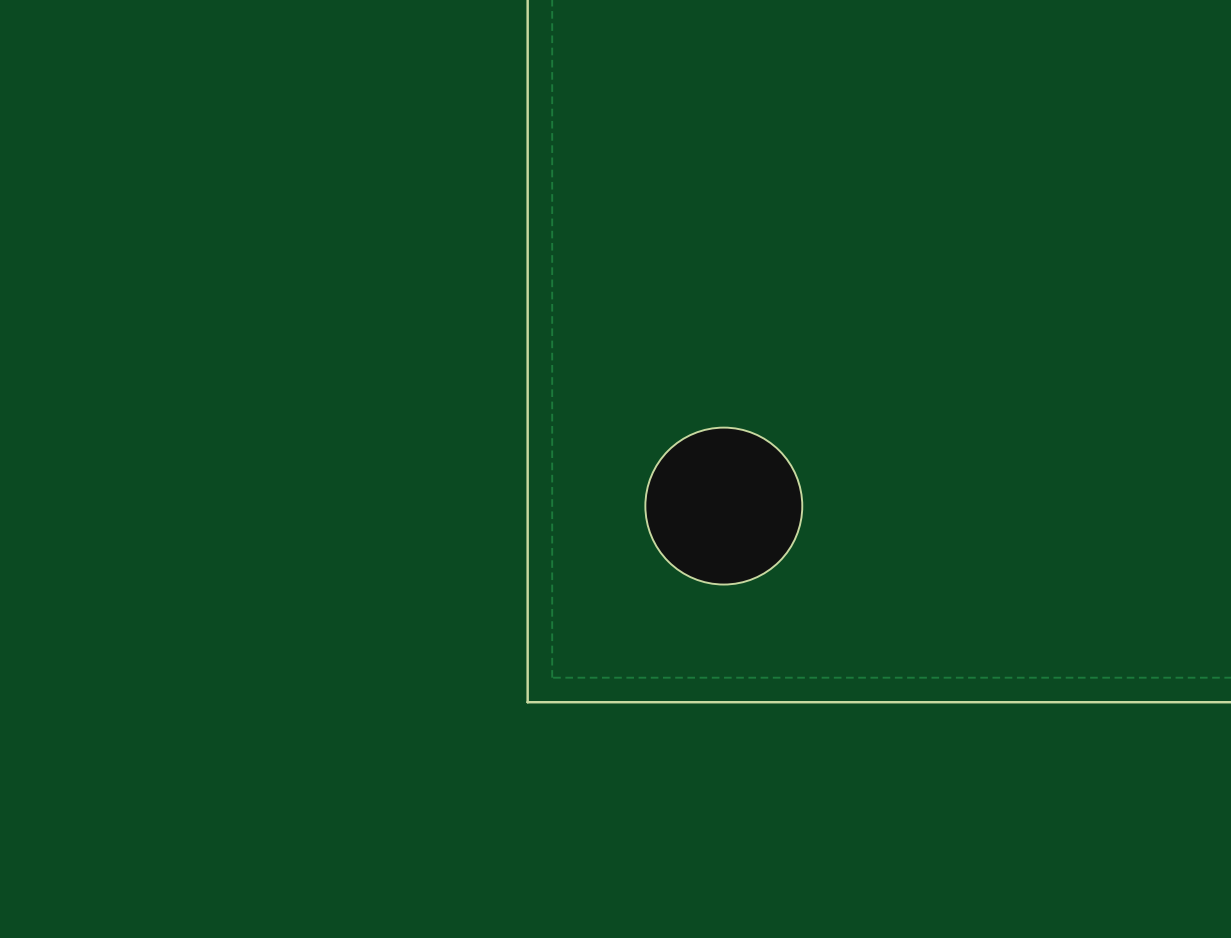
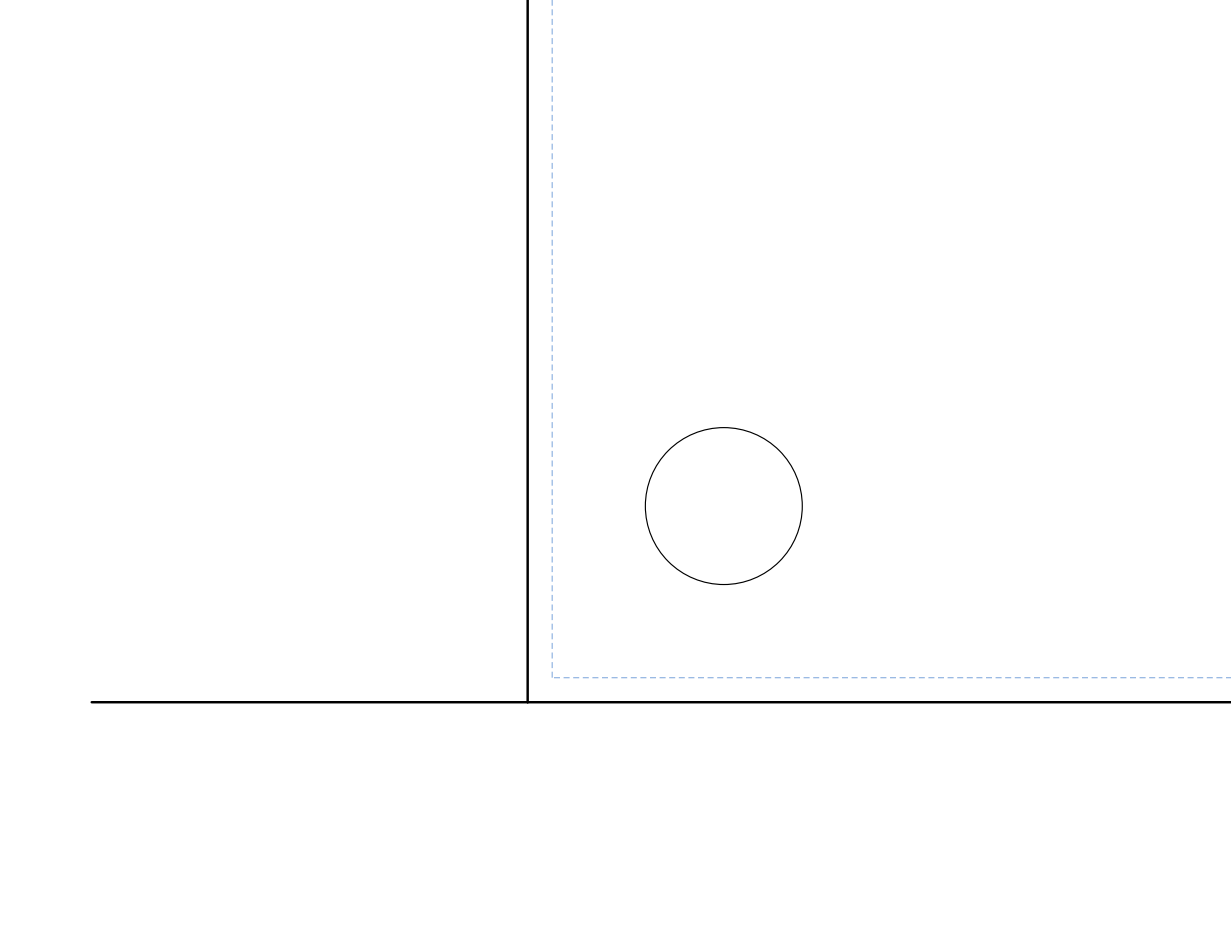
board edge: none -> (527, 702) (91, 702)

